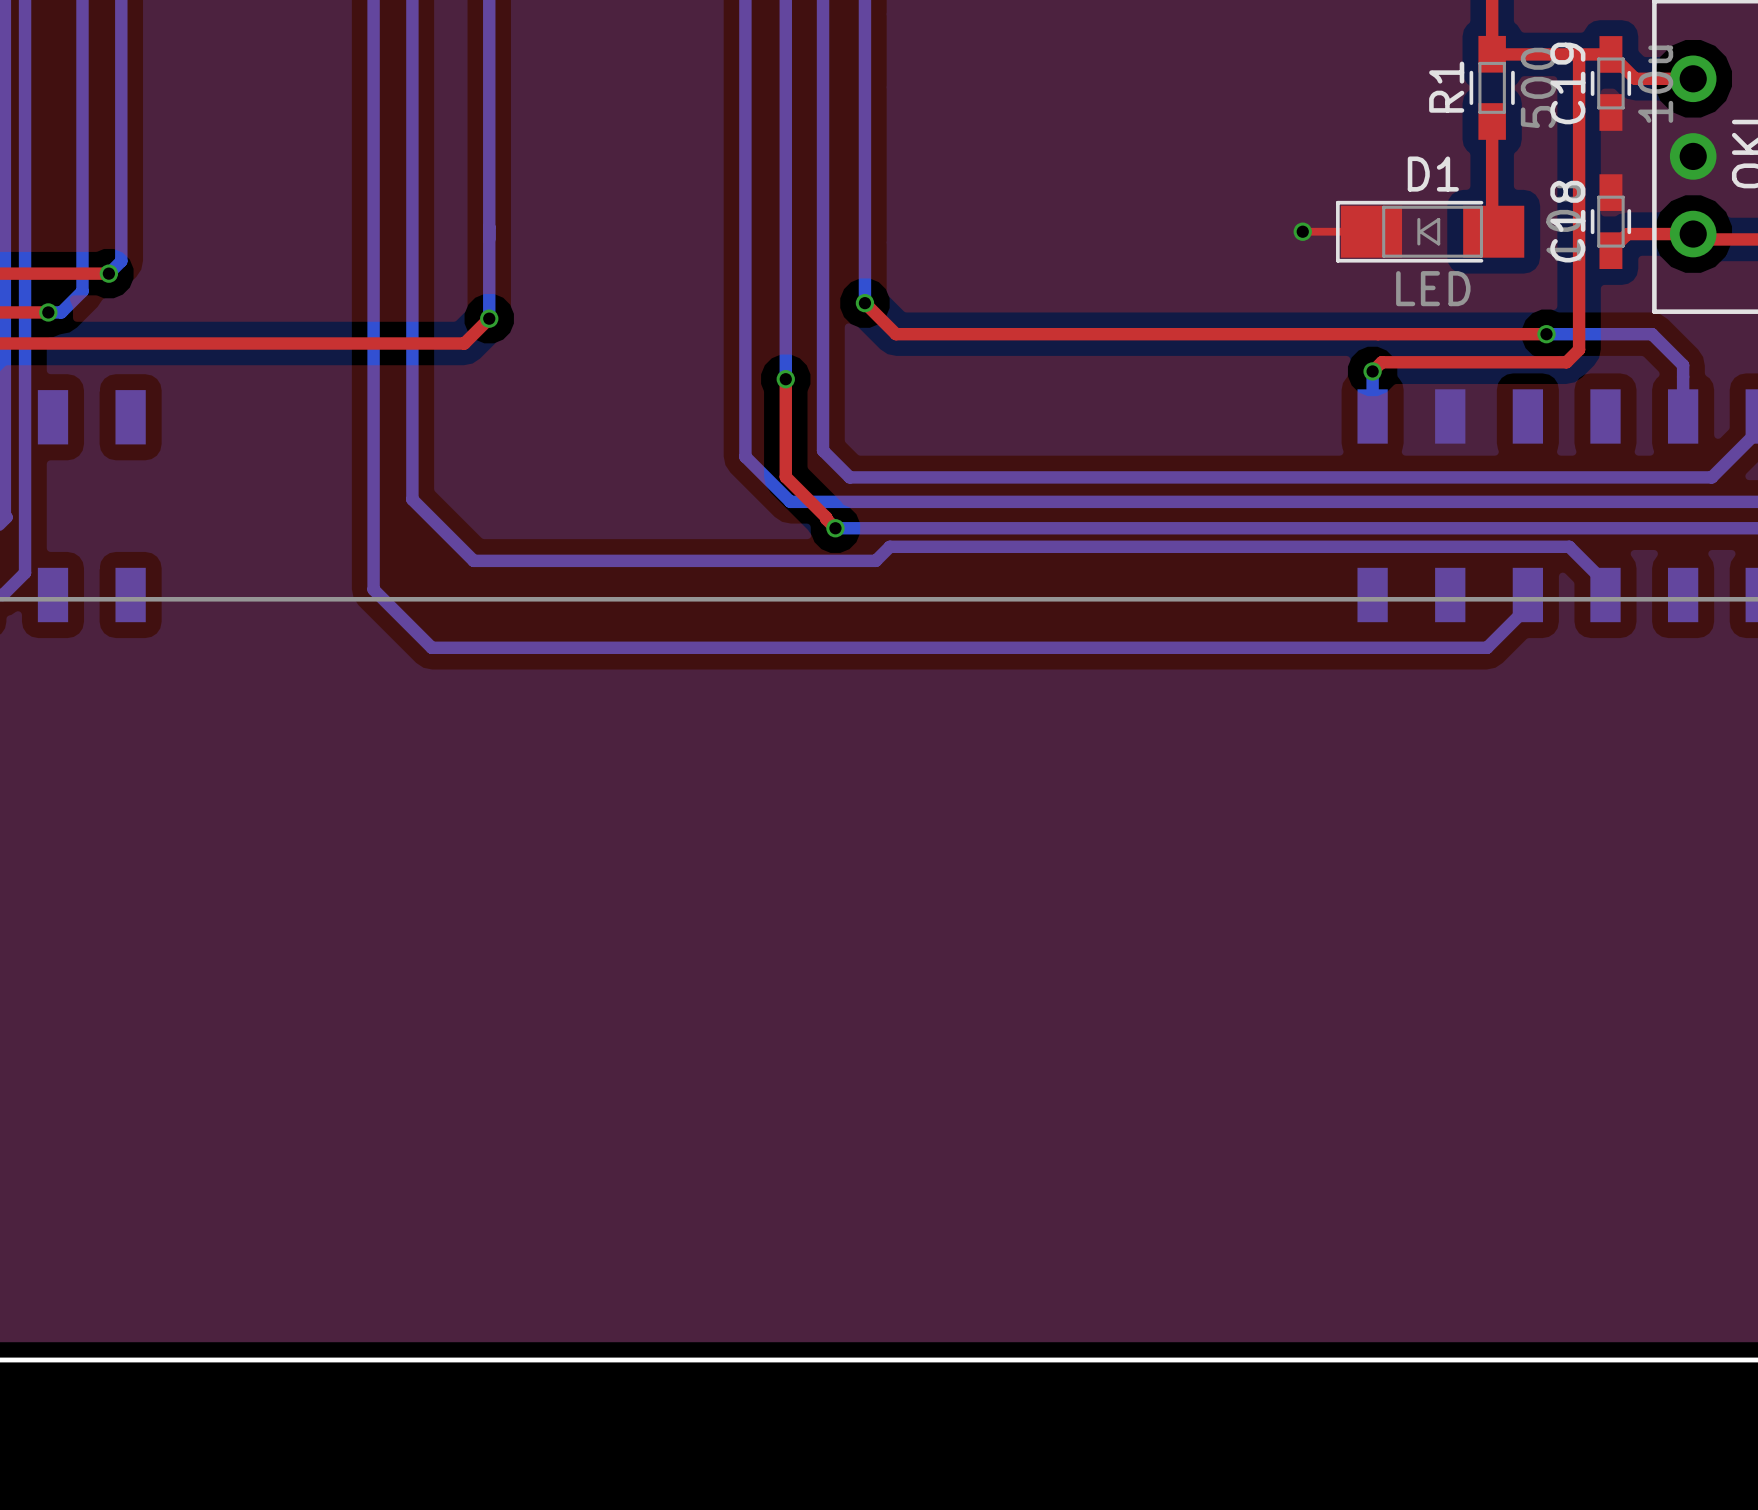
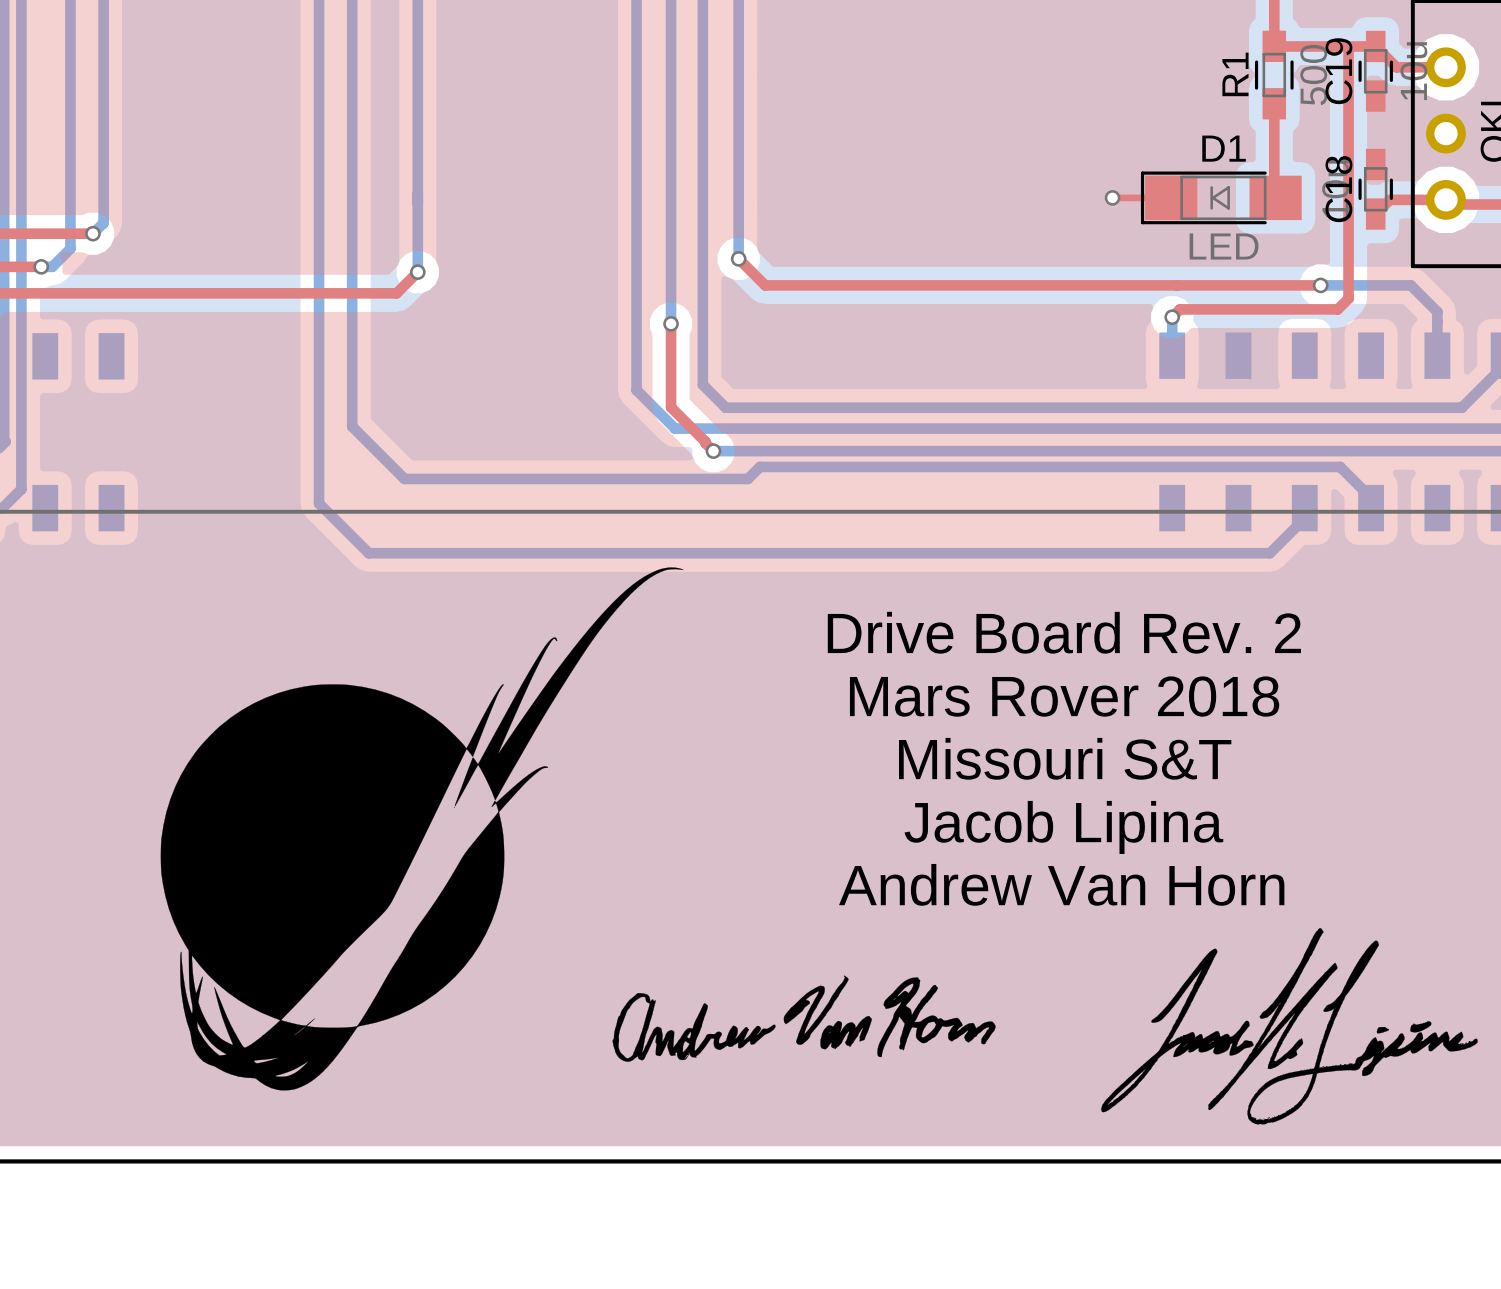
drawing: none -> [160, 567, 996, 1091]
text: none -> Drive Board Rev. 2 (1064, 632)
text: none -> Mars Rover 2018 (1064, 696)
text: none -> Missouri S&T (1065, 758)
text: none -> Jacob Lipina (1063, 827)
text: none -> Andrew Van Horn (1061, 884)
drawing: none -> [1101, 928, 1478, 1125]

